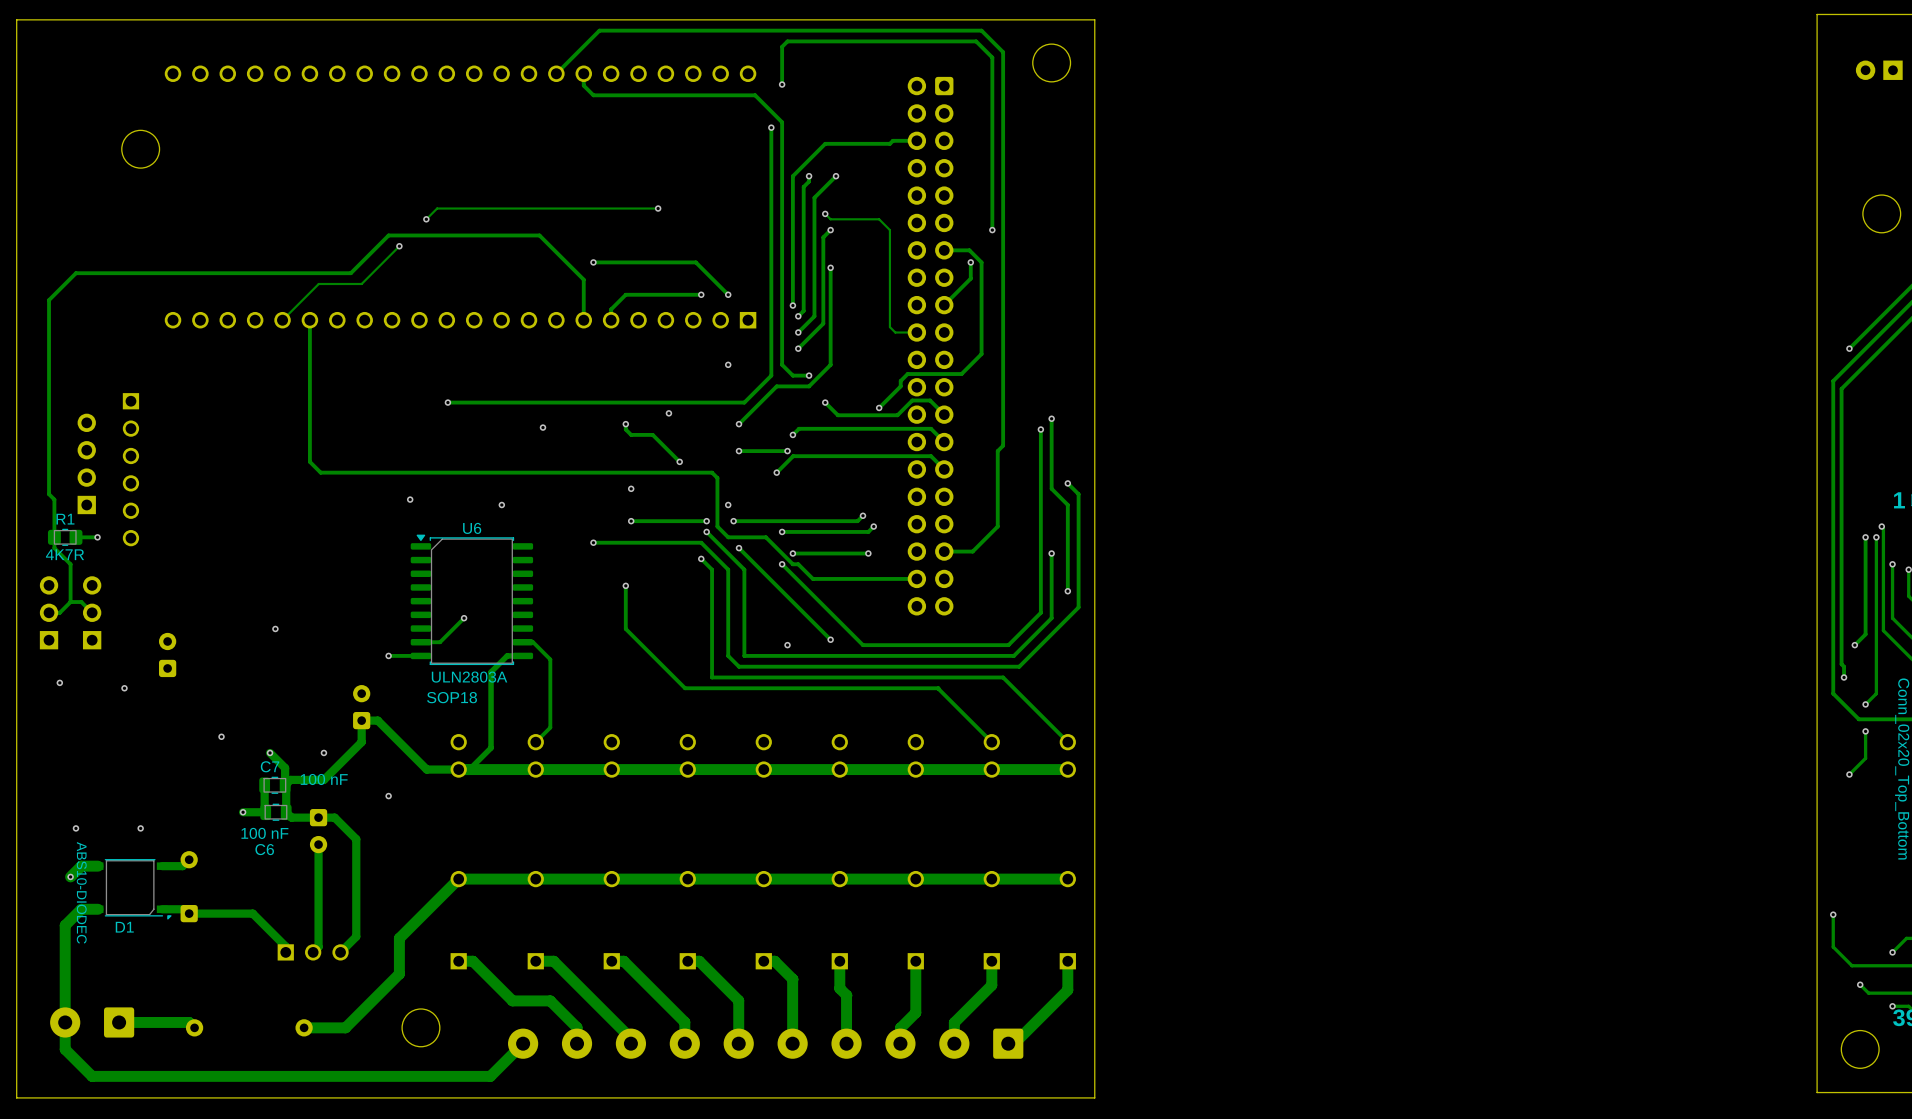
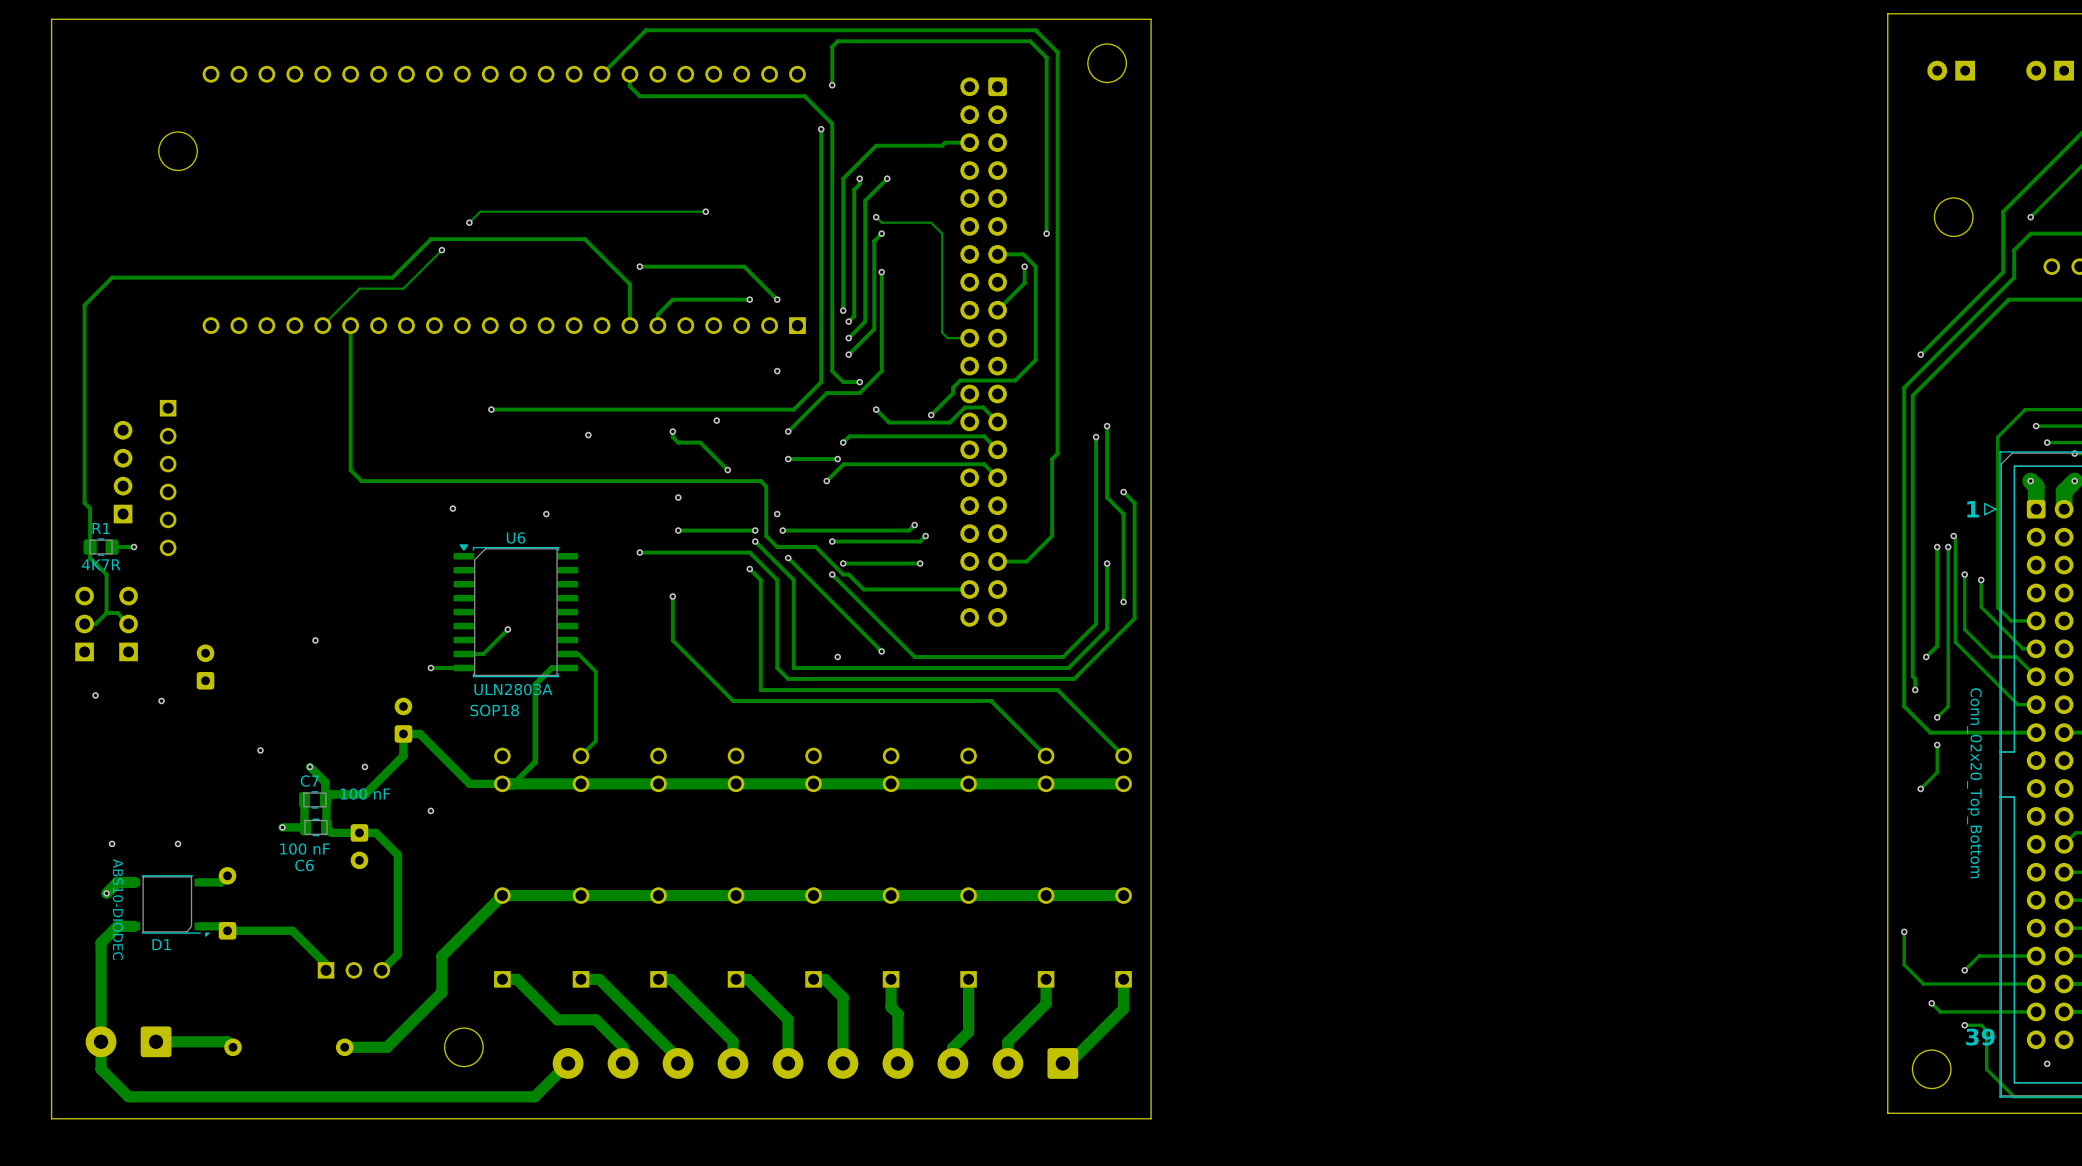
track: (318, 844) (318, 947) (313, 952) -> none

